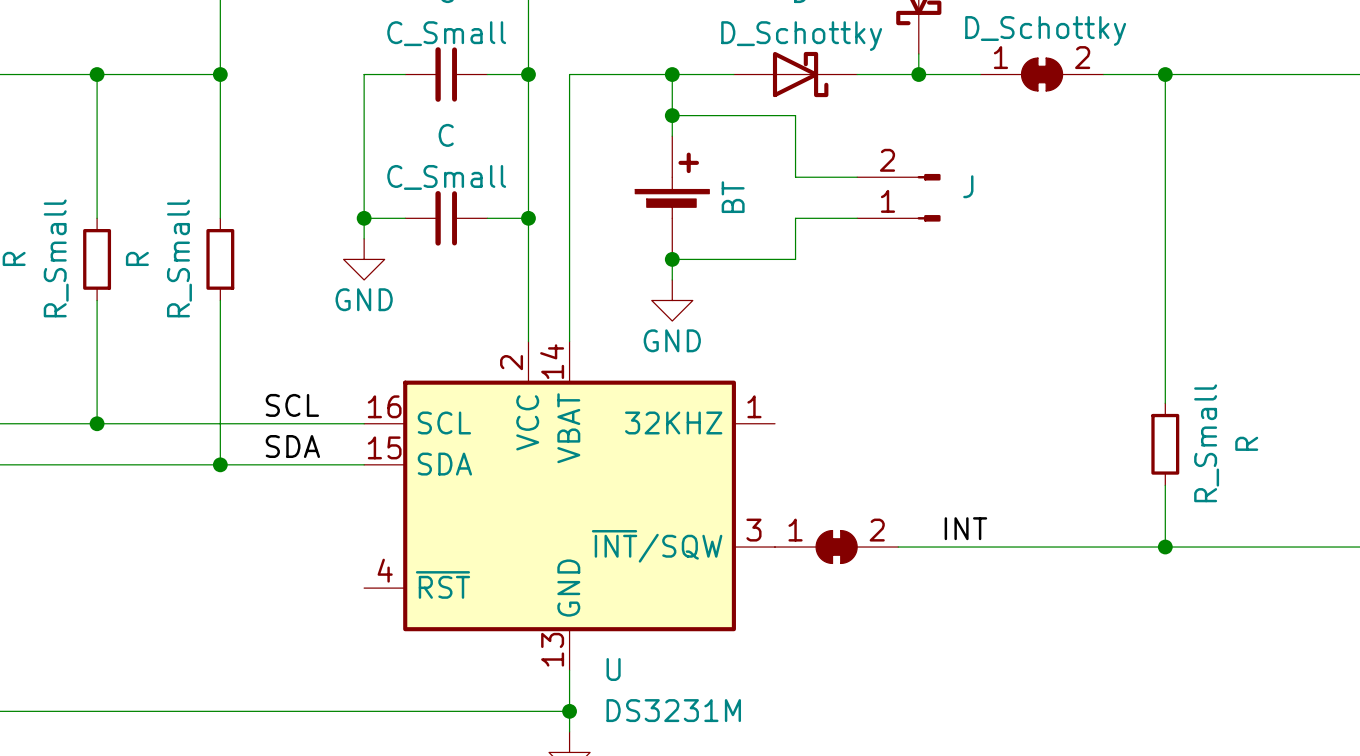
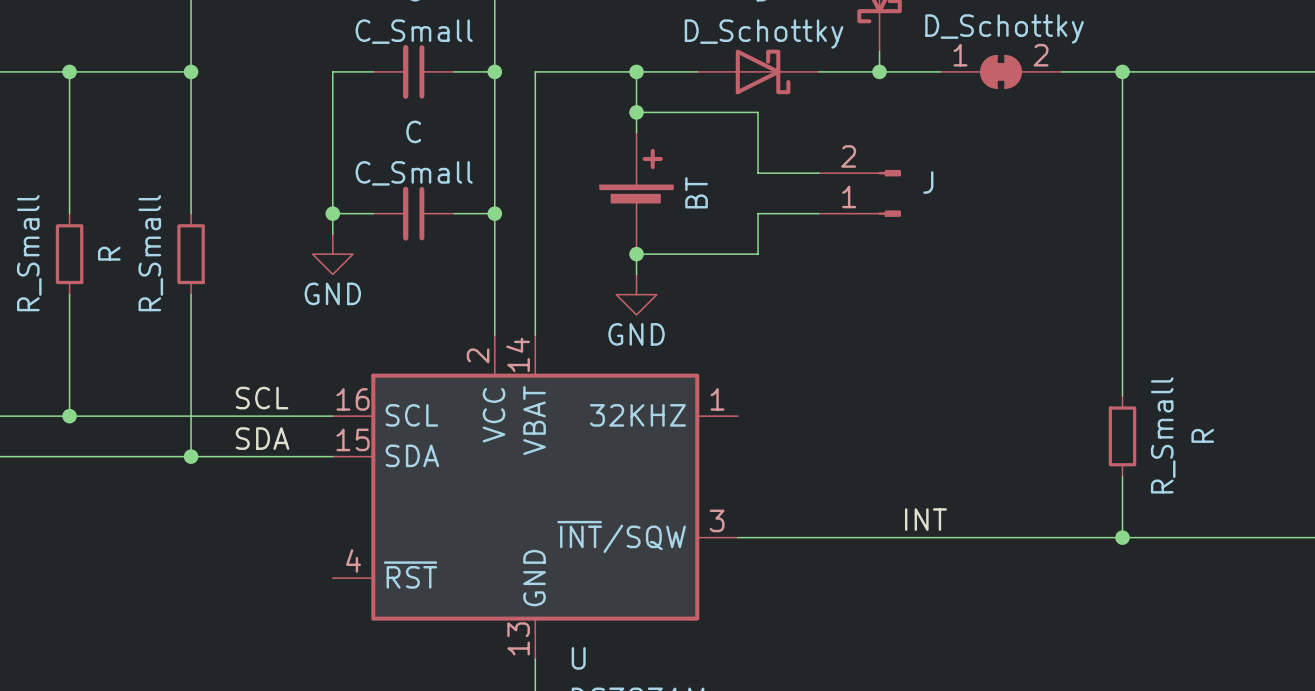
part: (836, 547) -> none

